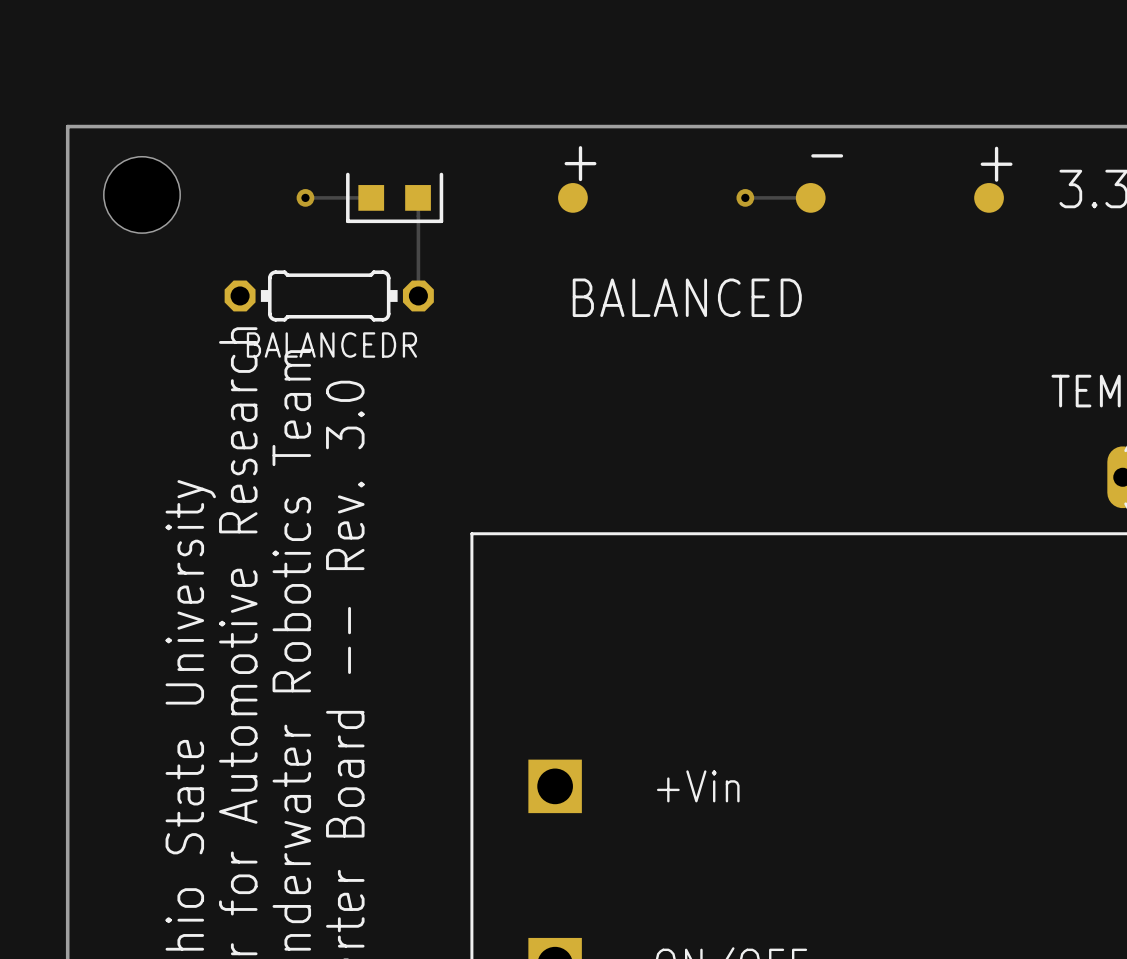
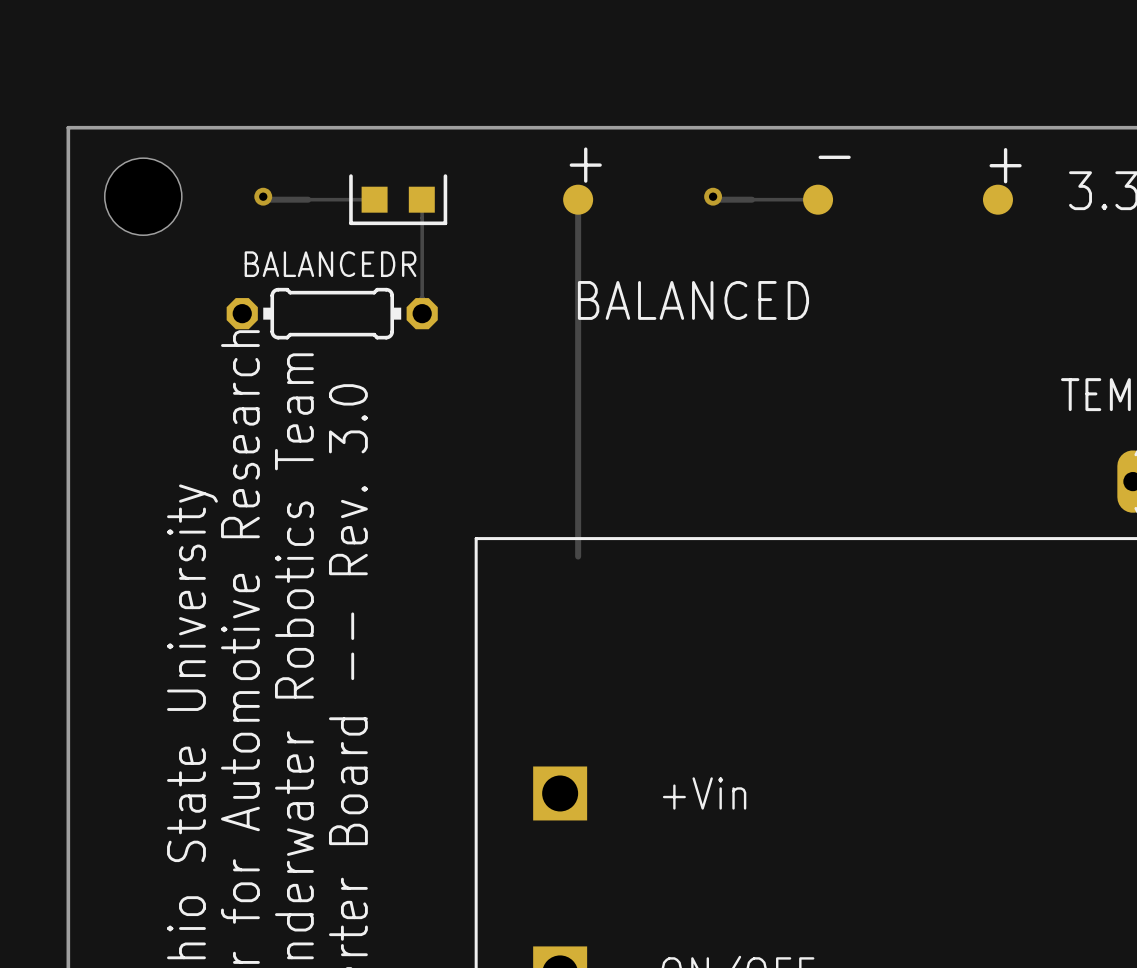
track: none -> (263, 196) (266, 199) (308, 199)
track: none -> (713, 196) (716, 199) (752, 199)
via position: (305, 197) -> (263, 196)
track: none -> (578, 199) (578, 556)
via position: (745, 197) -> (713, 196)
BALANCEDR position: (329, 295) -> (332, 313)
BALANCEDR name position: BALANCEDR (331, 345) -> BALANCEDR (330, 264)

